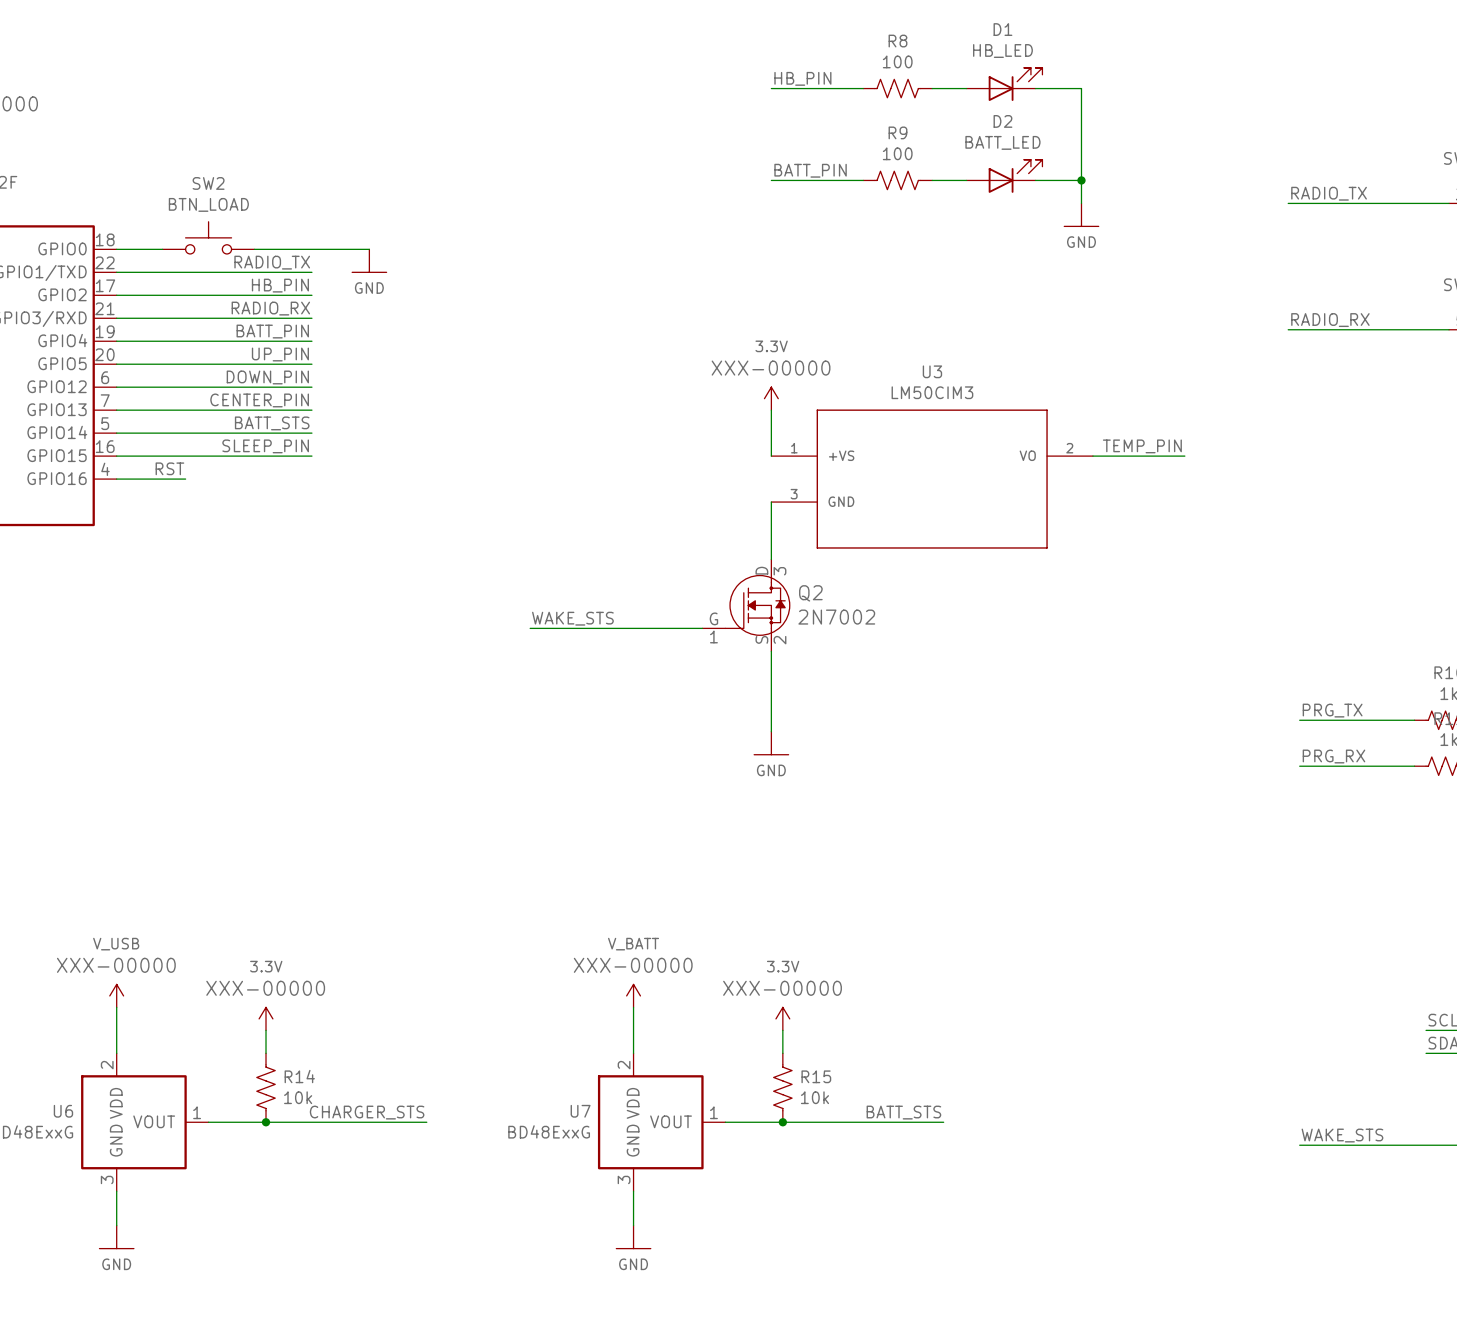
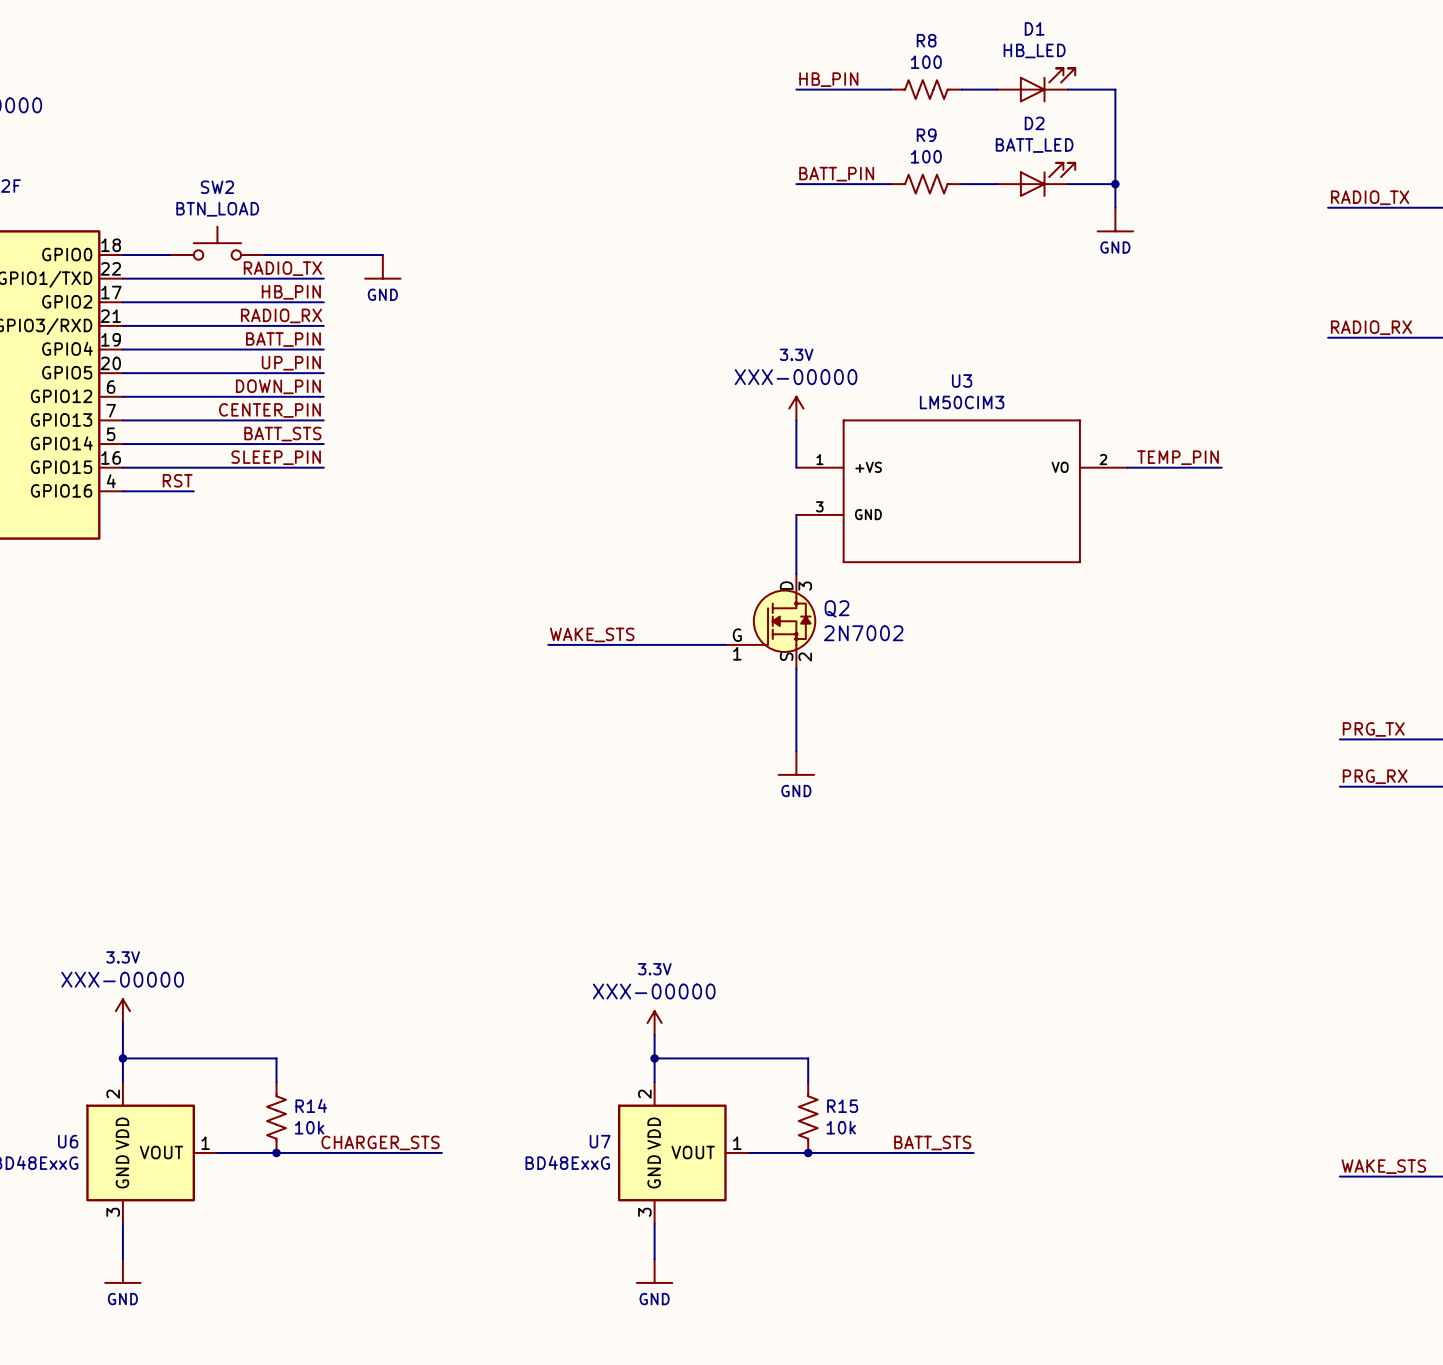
power symbol: V_USB (116, 995) -> none
power symbol: V_BATT (633, 995) -> 3.3V (654, 1023)
power symbol position: 3.3V (266, 1018) -> 3.3V (122, 1011)
power symbol: 3.3V (782, 1018) -> none
wire: none -> (122, 1058) (276, 1058)
junction: none -> (122, 1058)
wire: none -> (654, 1058) (808, 1058)
junction: none -> (654, 1058)

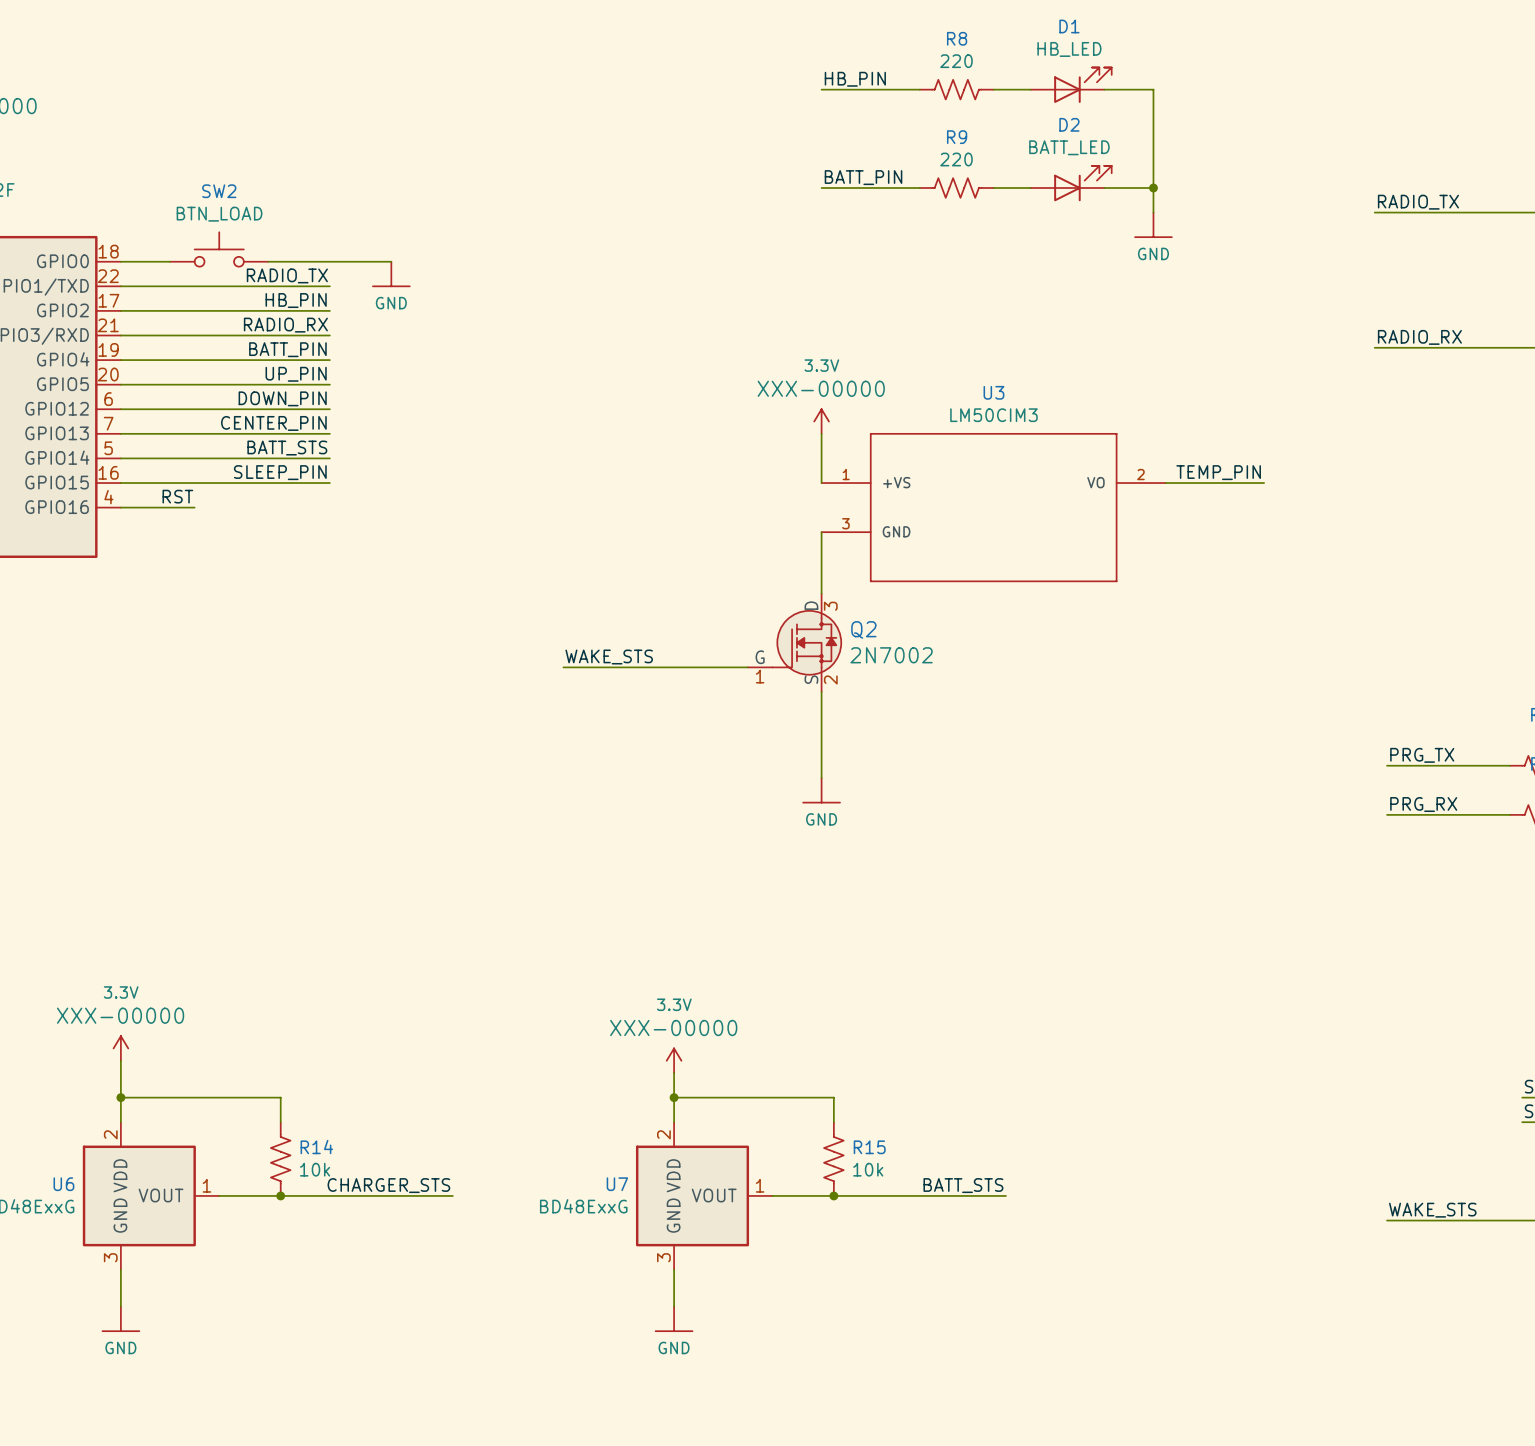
R8 value: 100 (926, 62) -> 220 (956, 61)
R9 value: 100 (926, 156) -> 220 (956, 159)

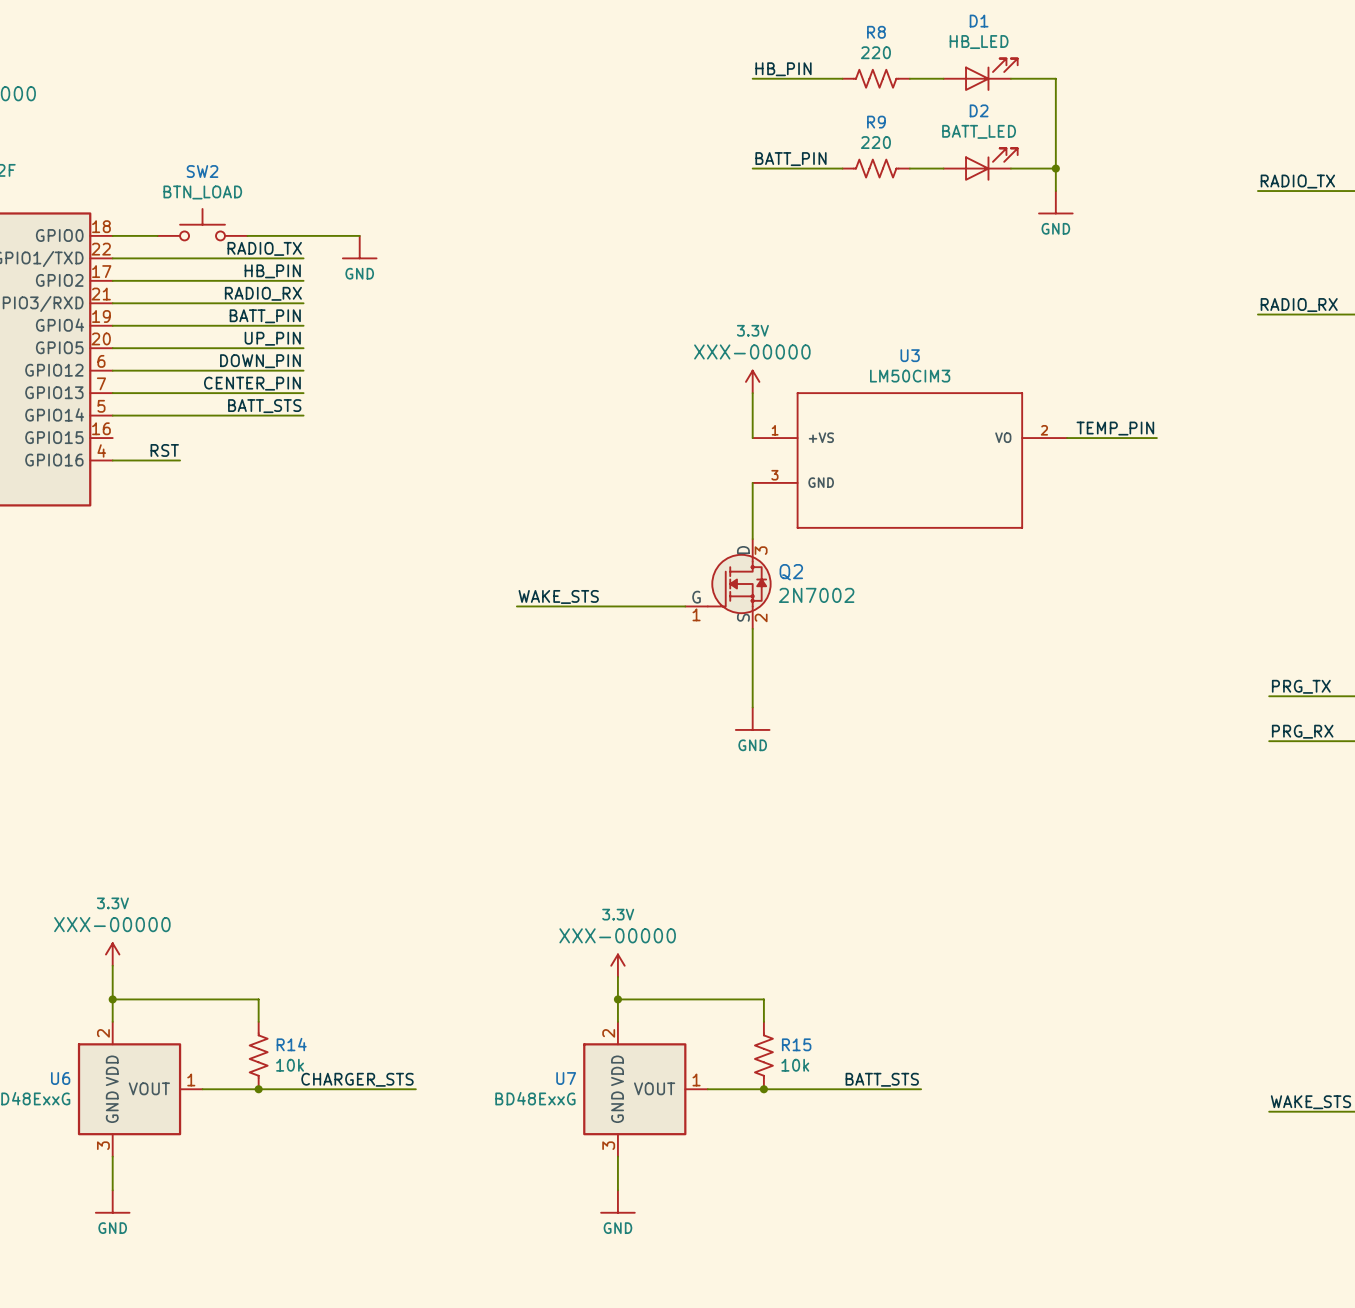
label: SLEEP_PIN (280, 472) -> none
wire: (120, 483) (329, 483) -> none

